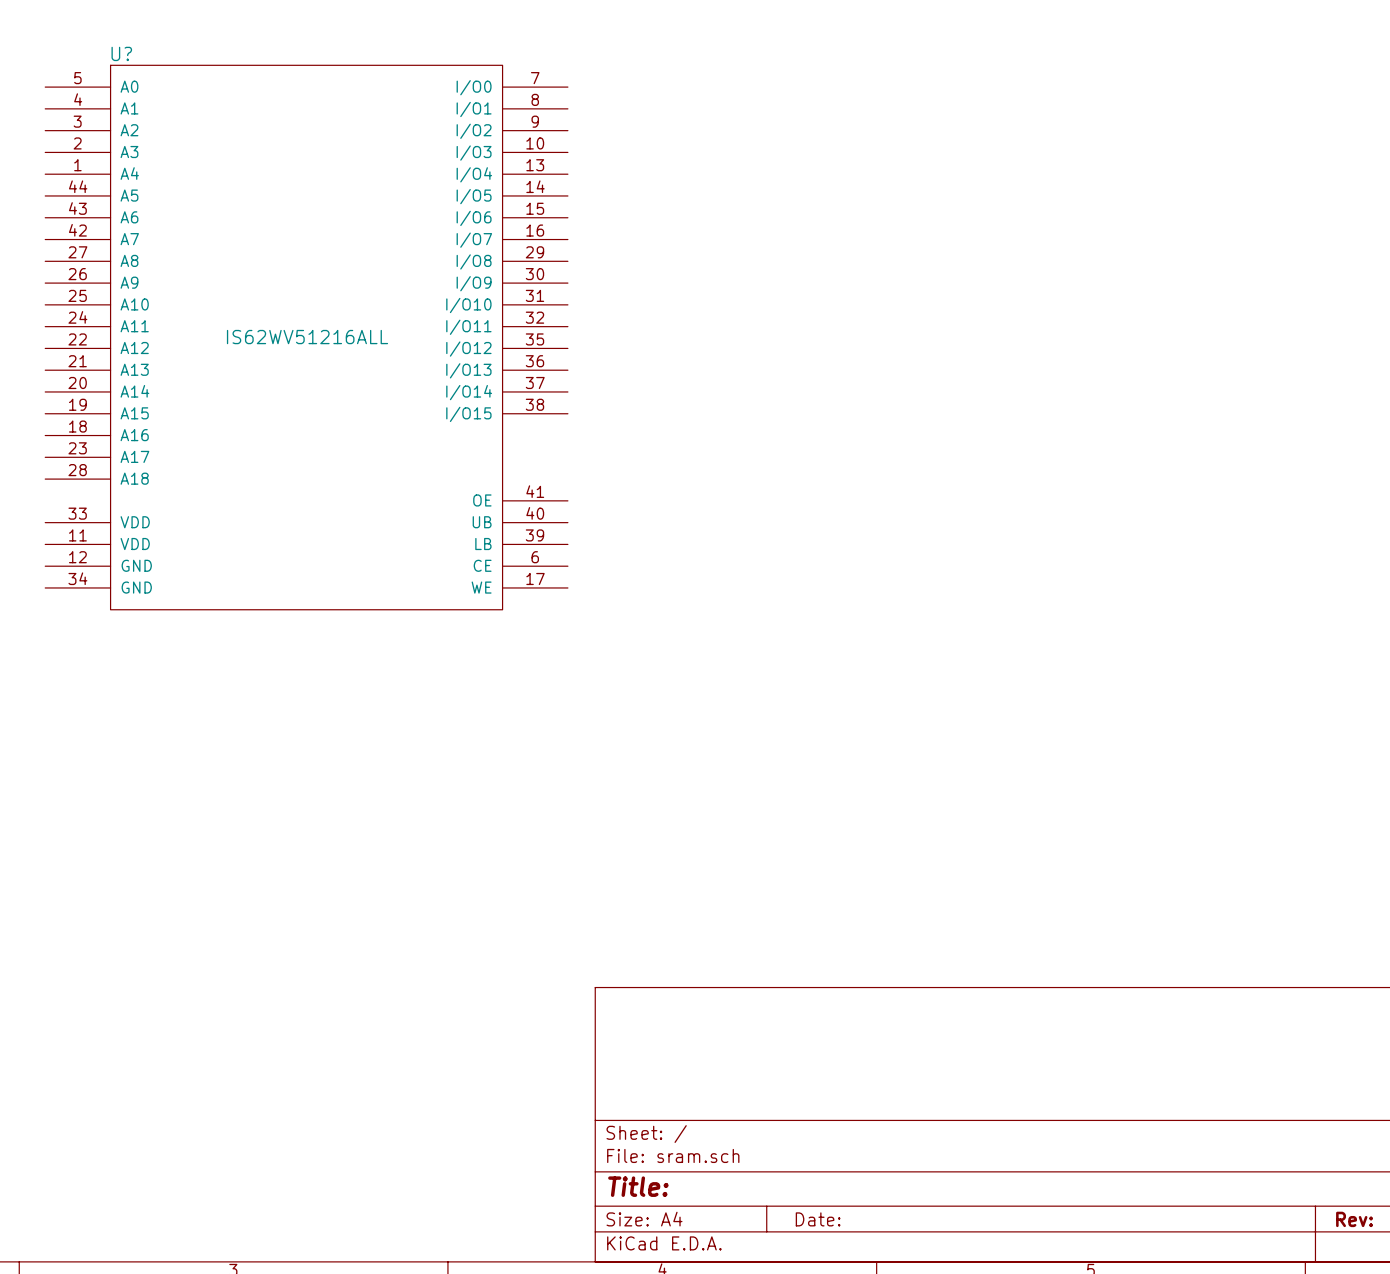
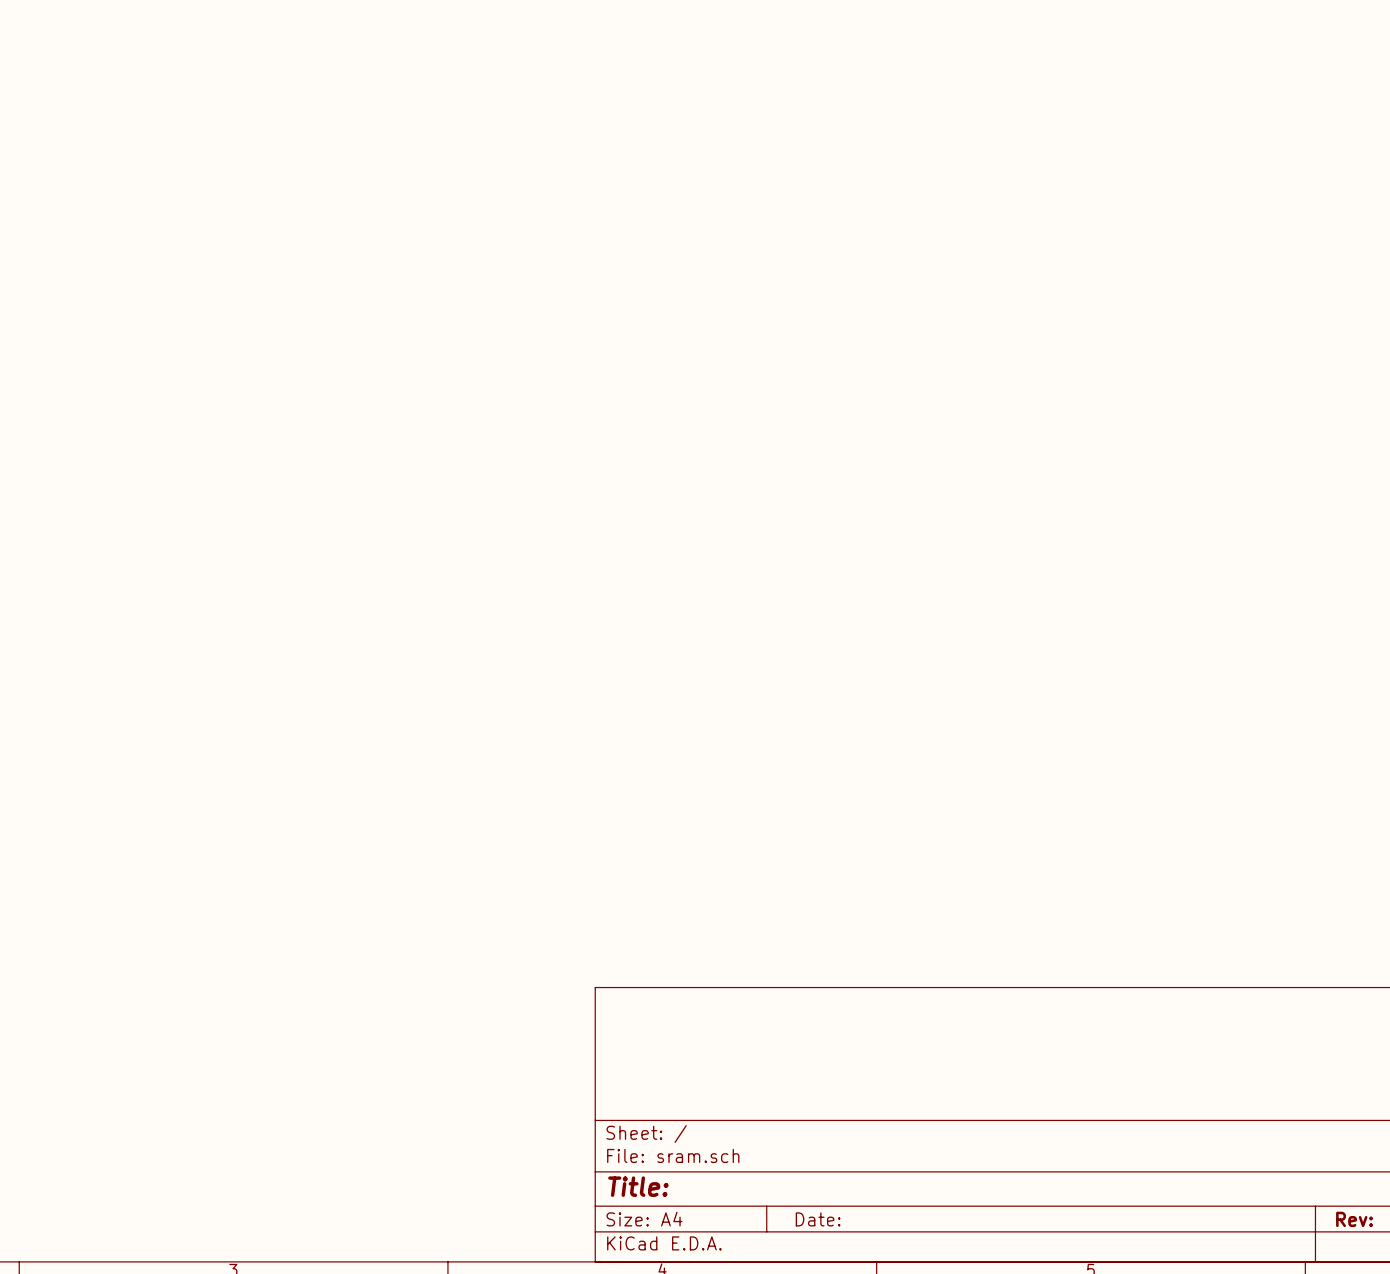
U?: IS62WV51216ALL (306, 337) -> none

